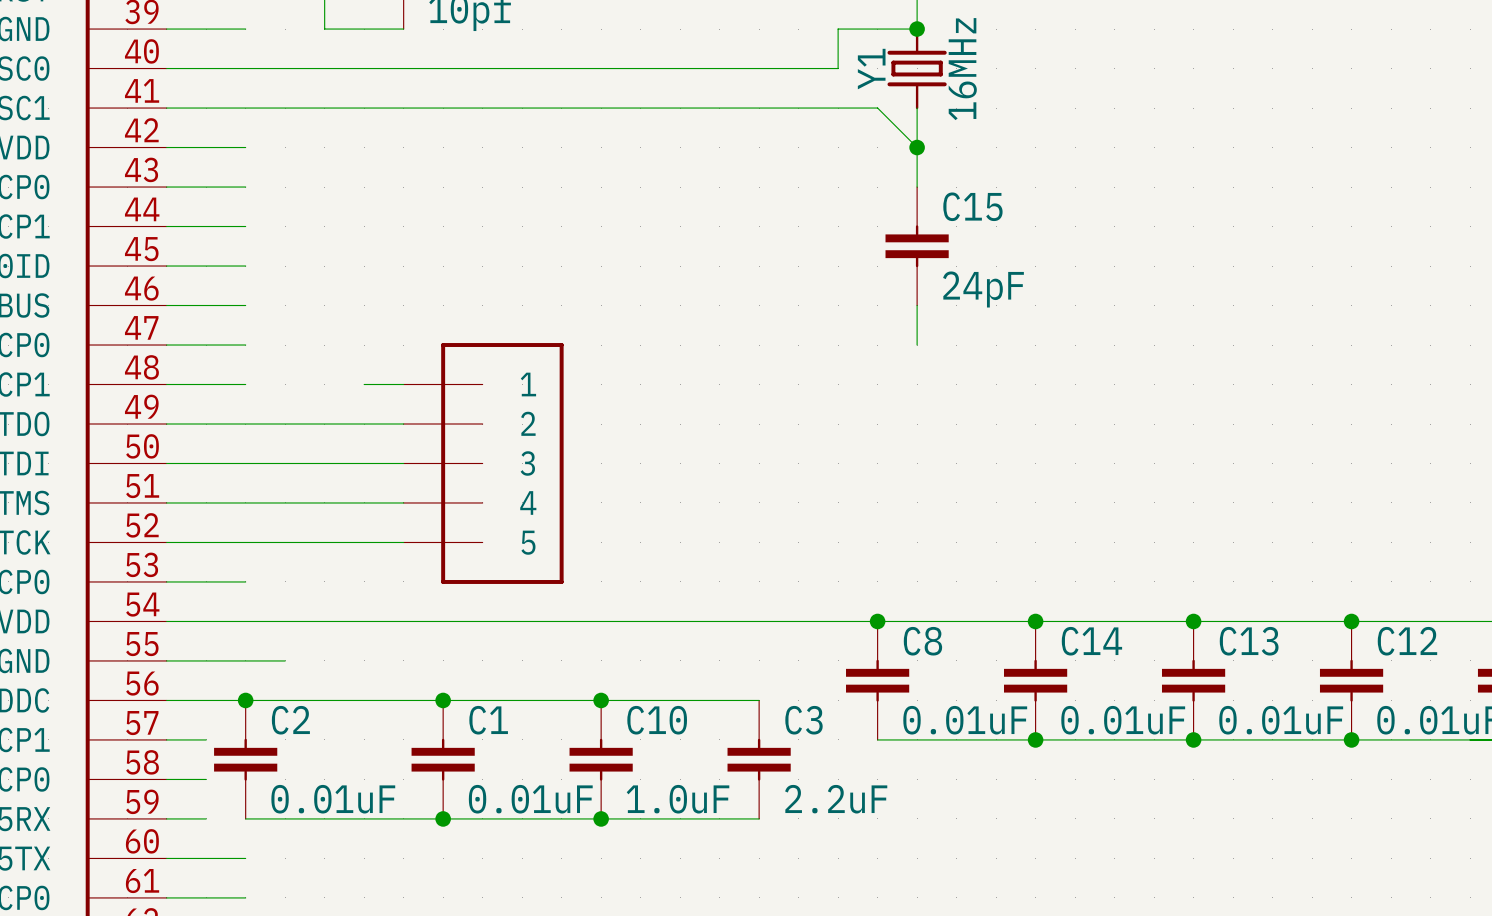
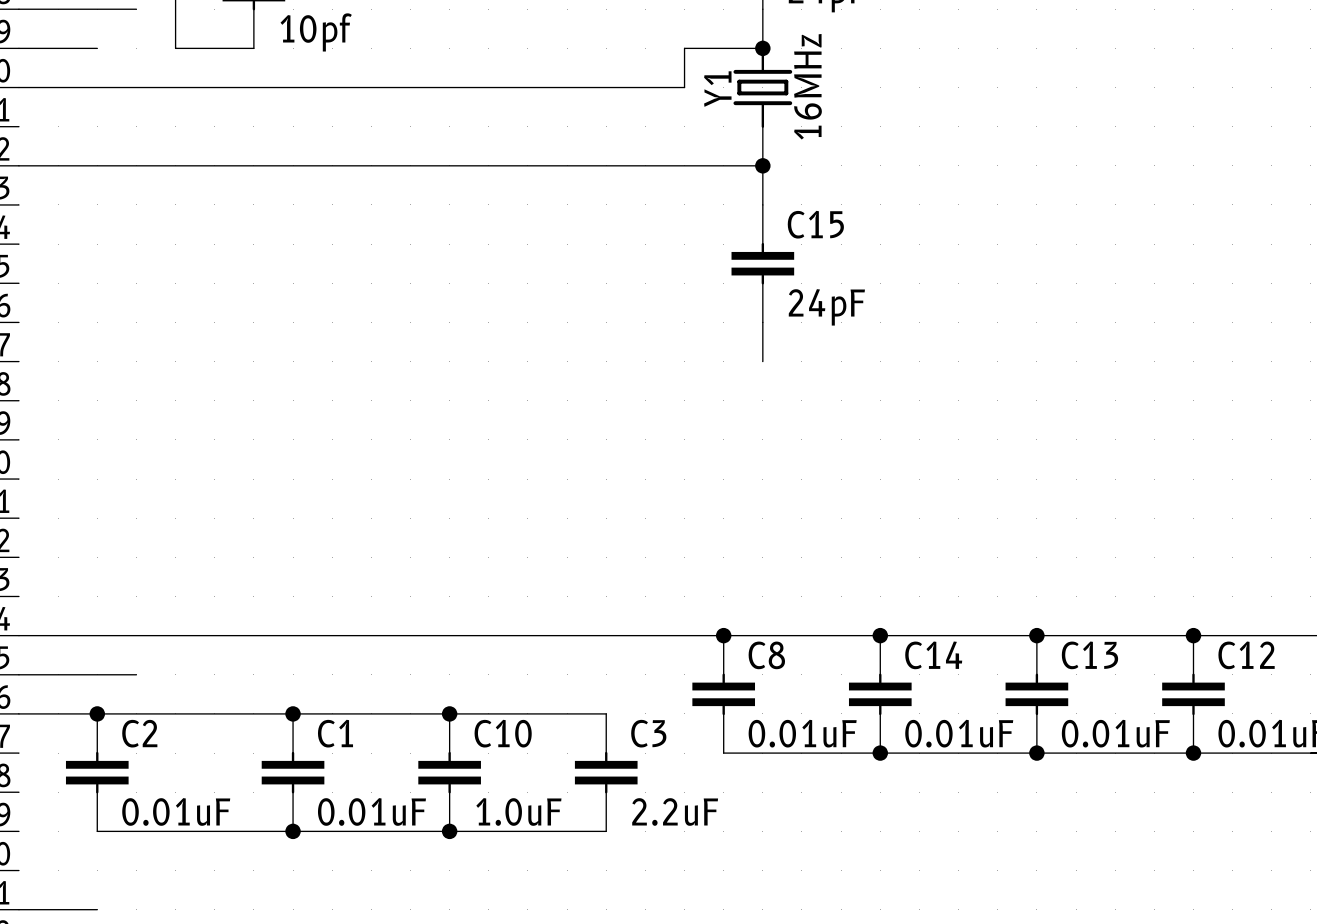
wire: (166, 108) (877, 108) (917, 147) -> (97, 165) (762, 165)
wire: (166, 187) (245, 187) -> none
wire: (166, 226) (245, 226) -> none
wire: (166, 266) (245, 266) -> none
wire: (166, 305) (245, 305) -> none
wire: (166, 345) (245, 345) -> none
wire: (166, 384) (245, 384) -> none
wire: (364, 384) (403, 384) -> none
wire: (166, 424) (403, 424) -> none
wire: (166, 463) (403, 463) -> none
part: (483, 463) -> none
wire: (166, 502) (403, 502) -> none
wire: (166, 542) (403, 542) -> none
wire: (166, 581) (245, 581) -> none
wire: (166, 739) (206, 739) -> none
wire: (166, 779) (206, 779) -> none
wire: (166, 818) (206, 818) -> none
wire: (166, 858) (245, 858) -> none

